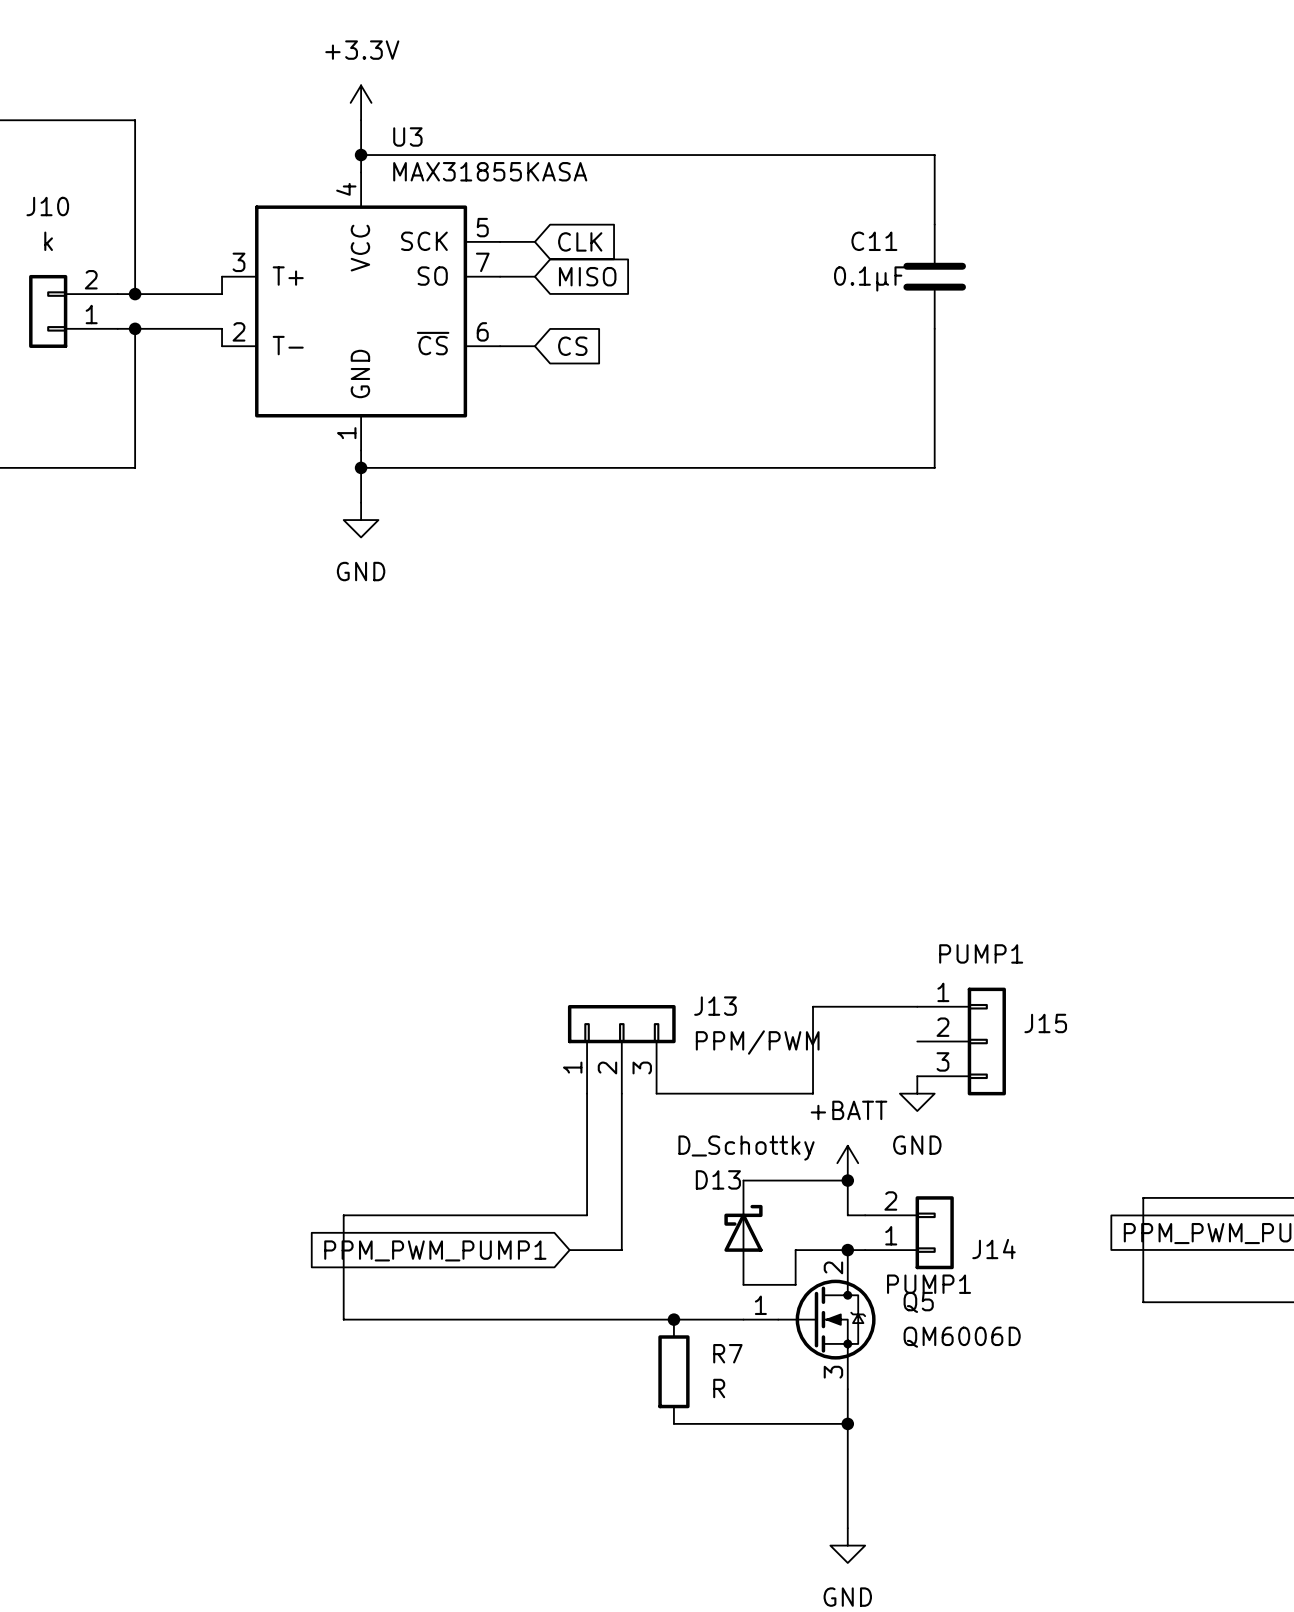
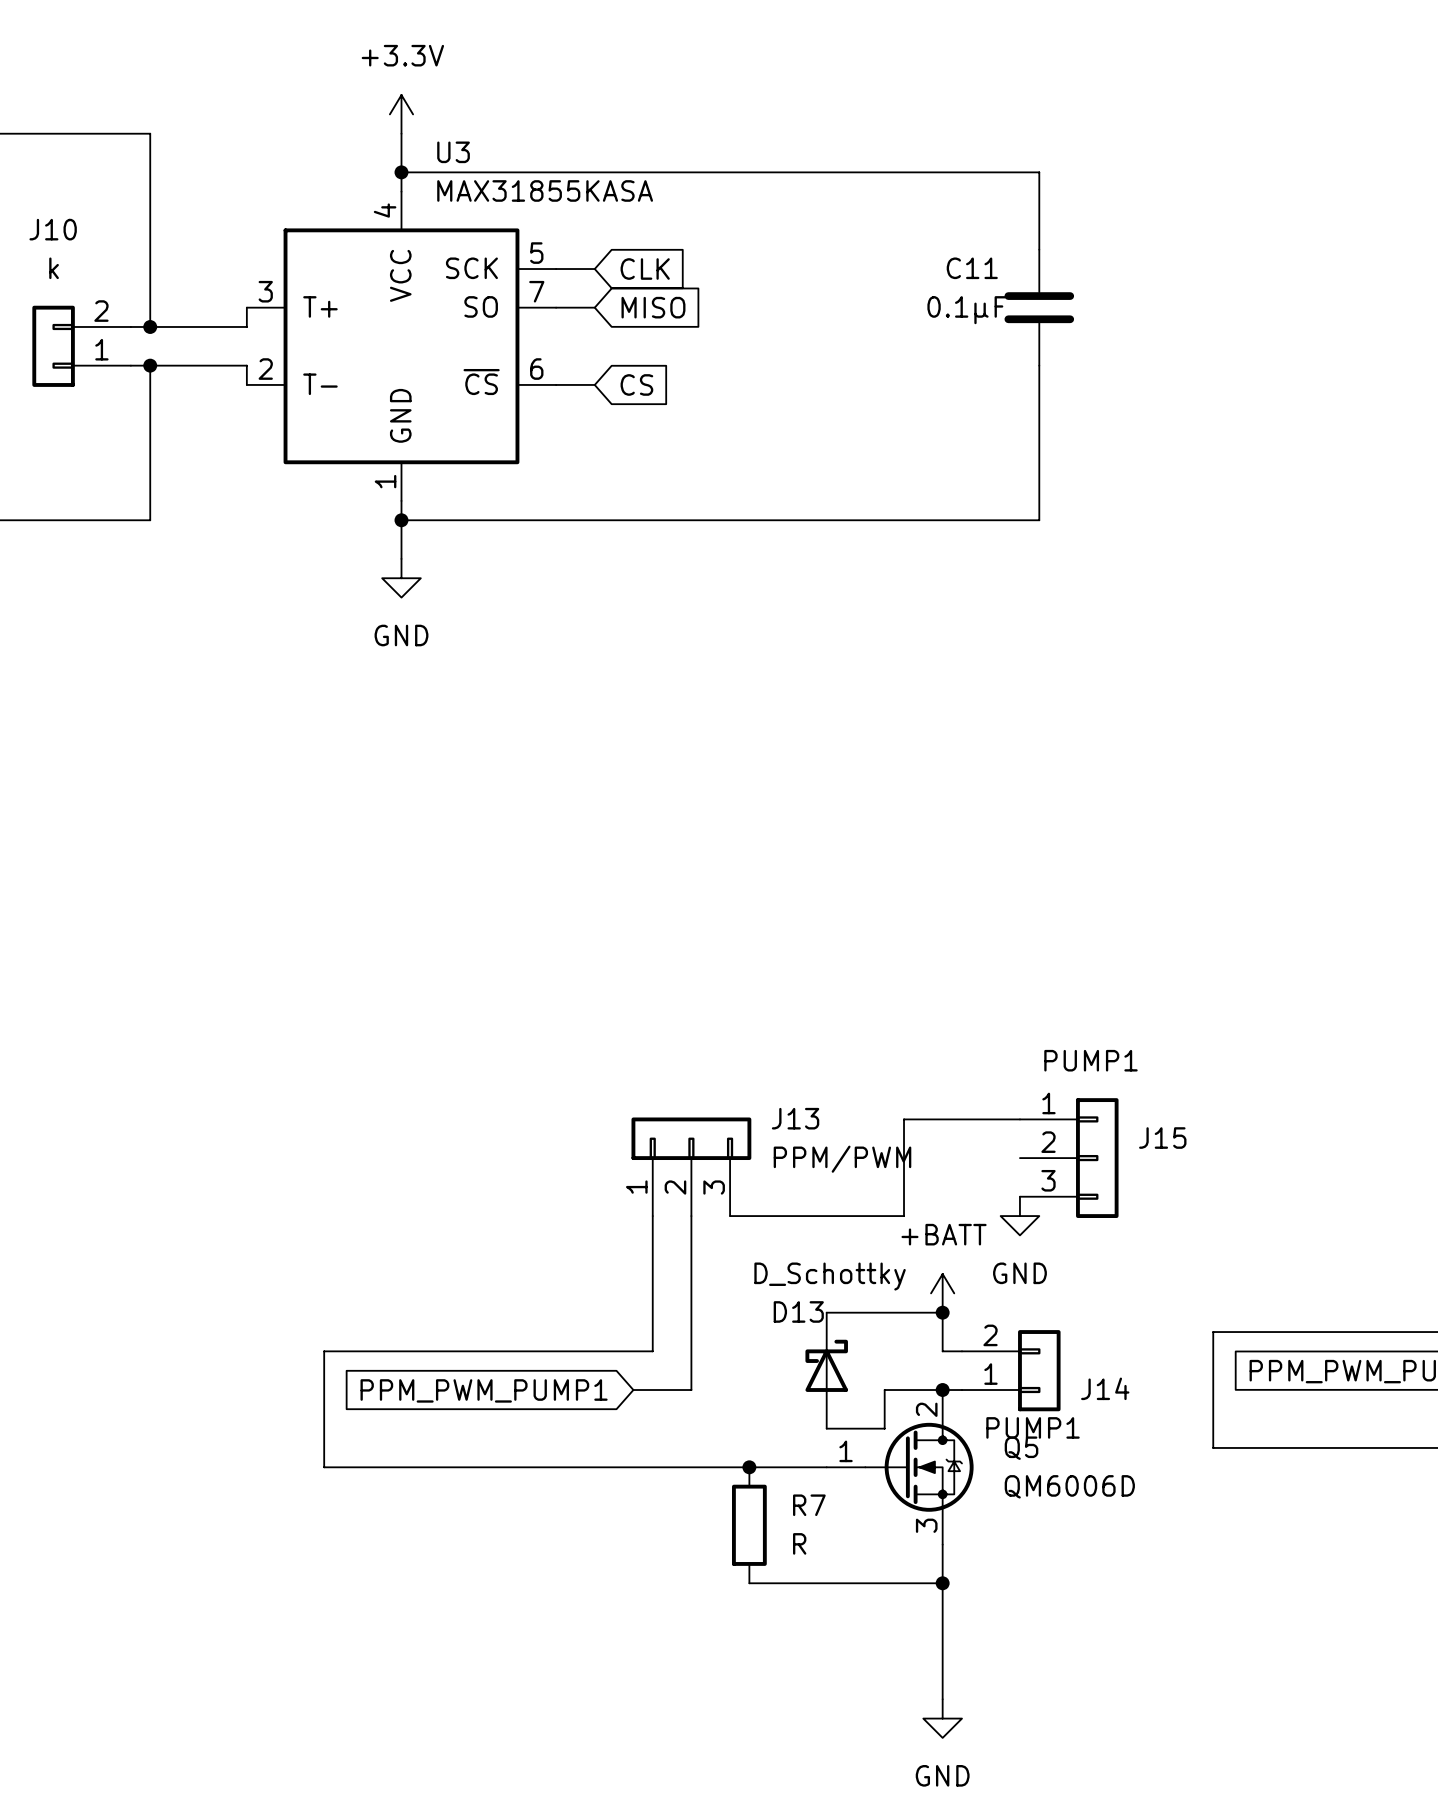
wire: (1143, 1197) (1143, 1302) -> (1271, 1332) (1213, 1332) (1213, 1447) (1271, 1447)
wire: (343, 1215) (343, 1319) -> (382, 1351) (324, 1351) (324, 1467) (382, 1467)

